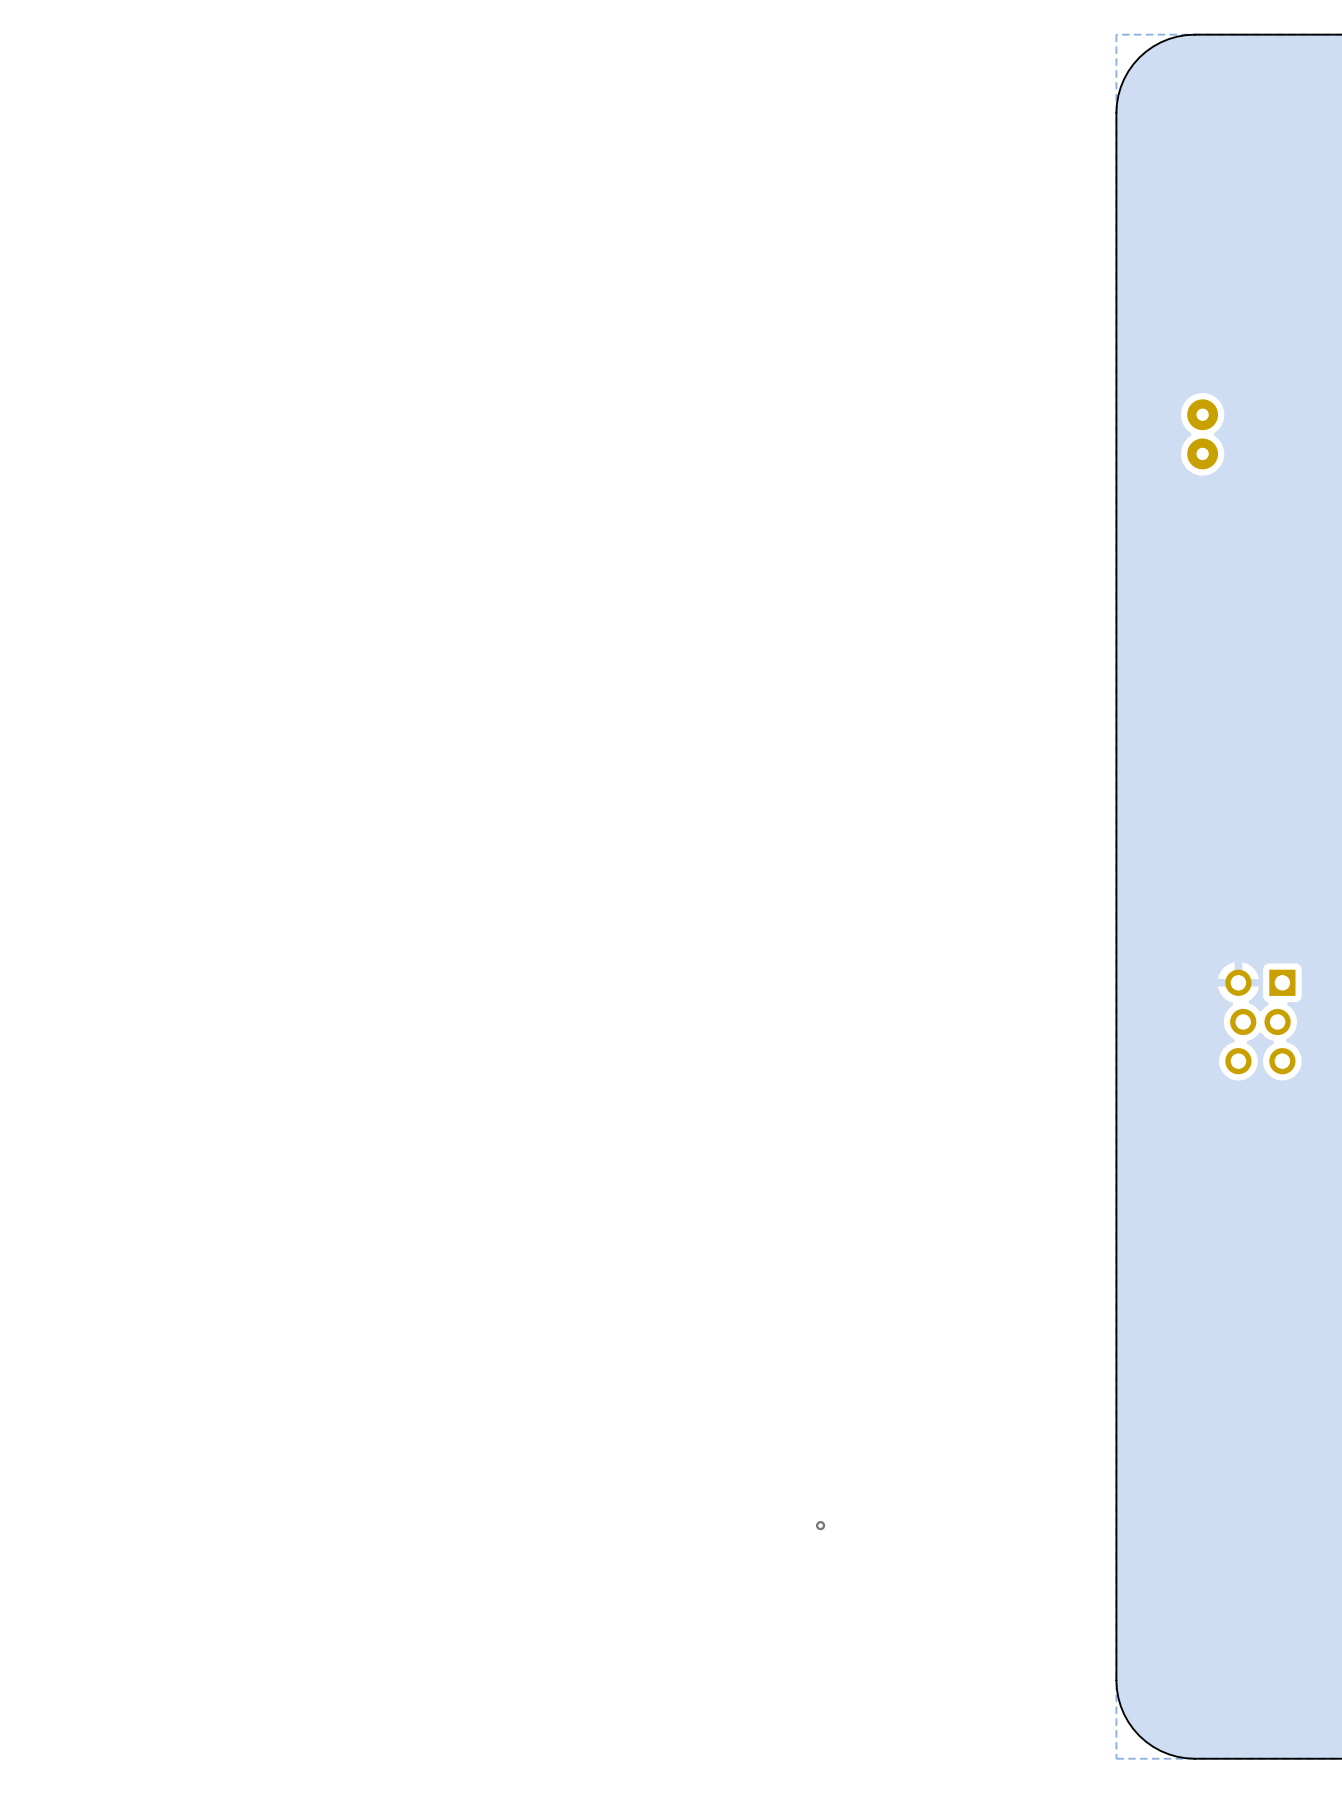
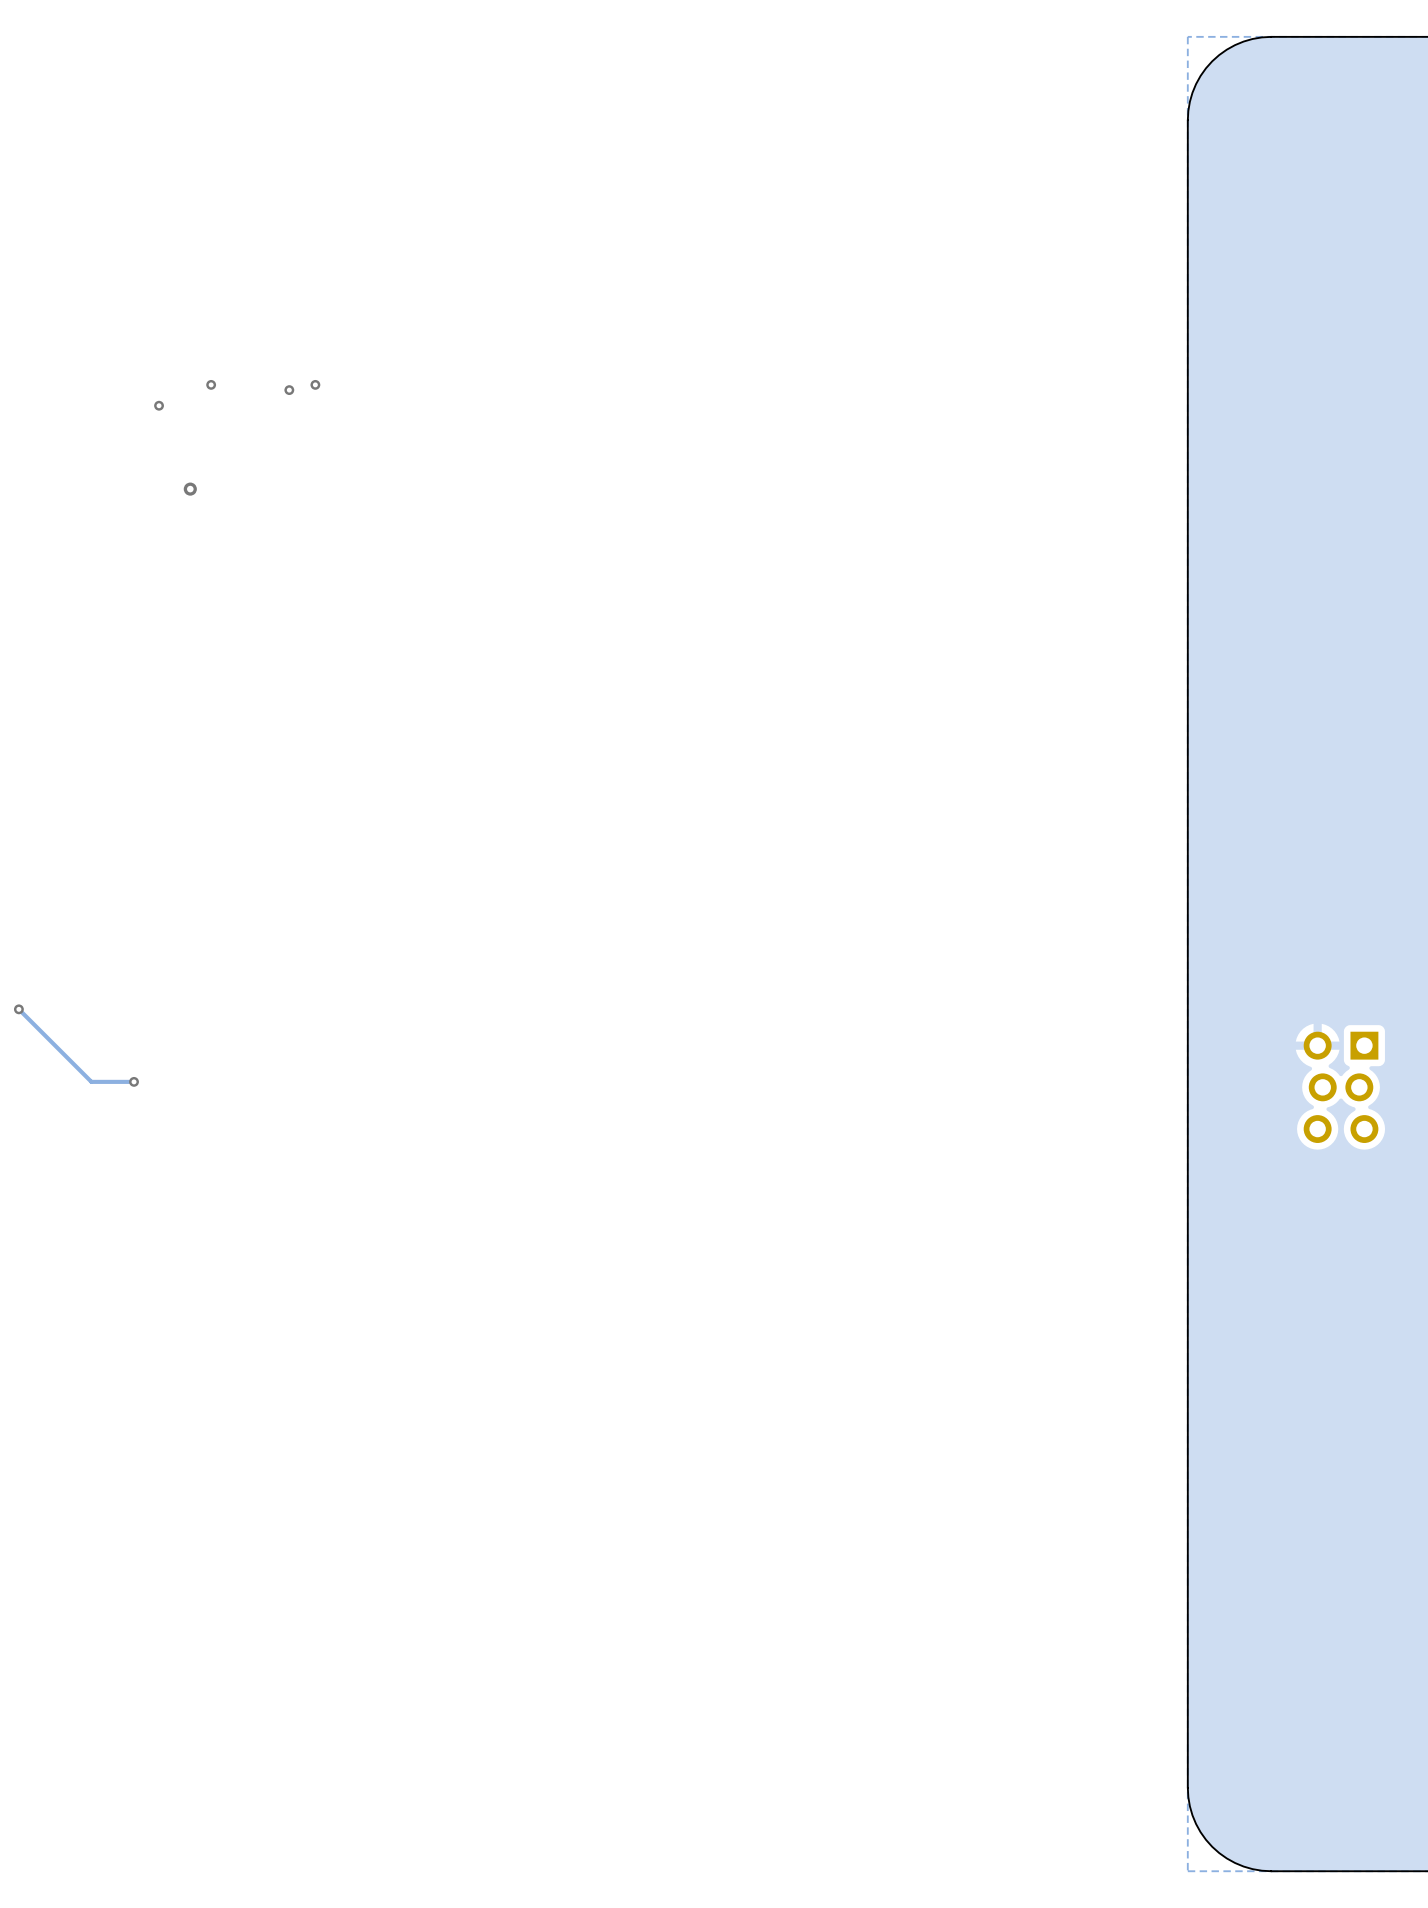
via: none -> (211, 384)
via: none -> (315, 384)
via: none -> (289, 390)
via: none -> (159, 405)
part: (1202, 434) -> none
via: none -> (190, 489)
track: none -> (18, 1009) (91, 1081) (134, 1081)
via: none -> (18, 1009)
via: none -> (134, 1081)
via: (820, 1525) -> none

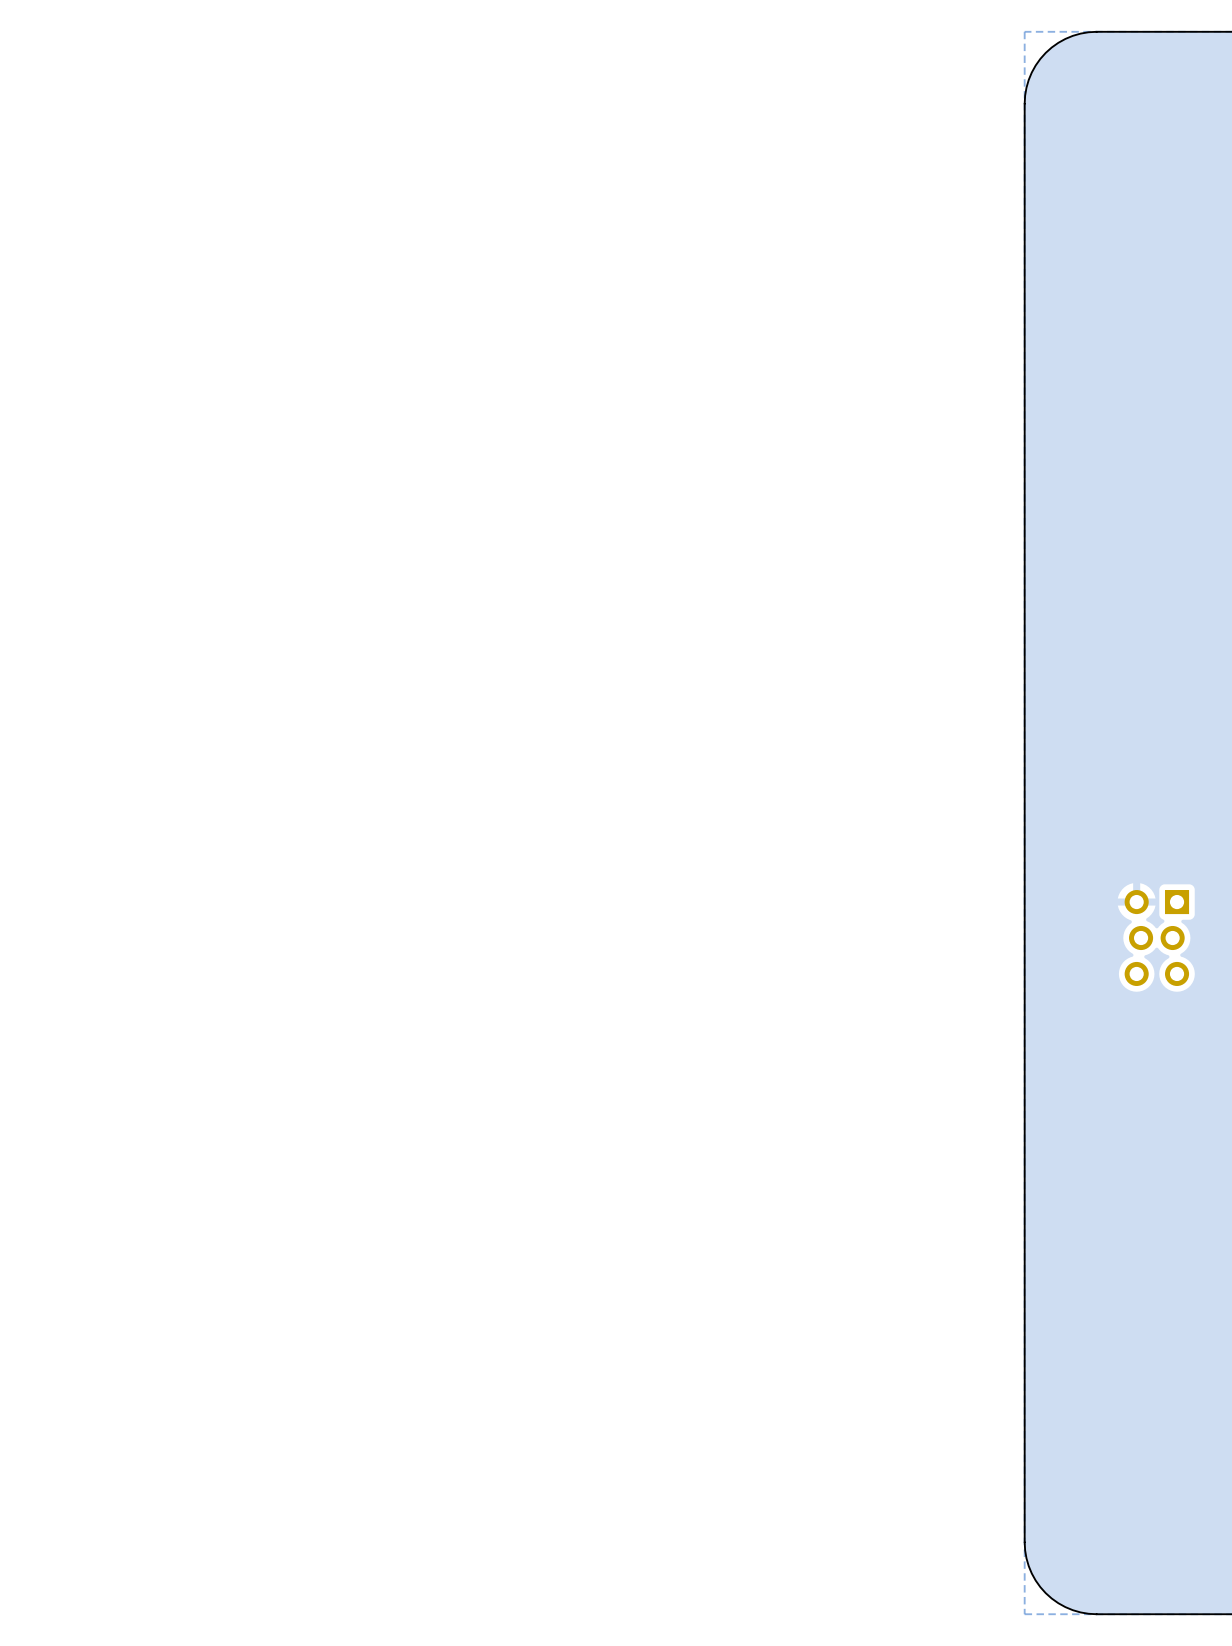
via: (211, 384) -> none
via: (315, 384) -> none
via: (289, 390) -> none
via: (159, 405) -> none
via: (190, 489) -> none
track: (18, 1009) (91, 1081) (134, 1081) -> none
via: (18, 1009) -> none
via: (134, 1081) -> none

